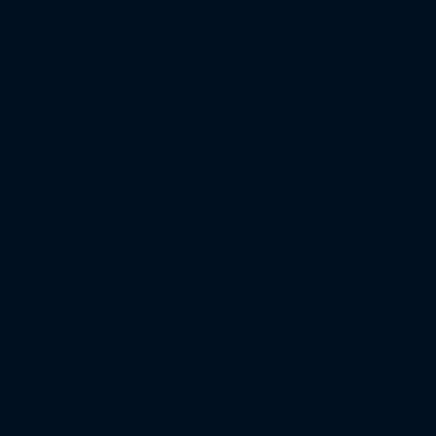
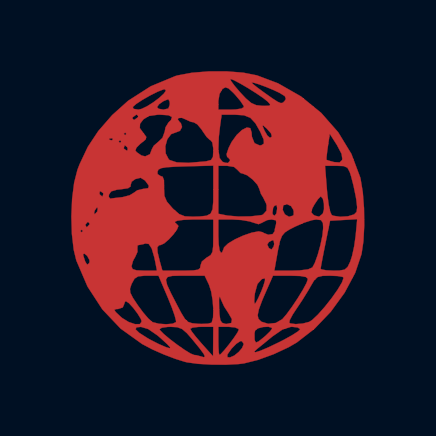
part: none -> (217, 218)

